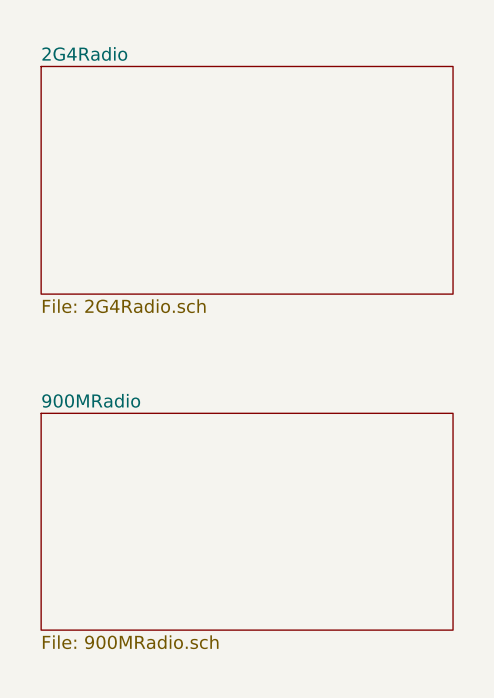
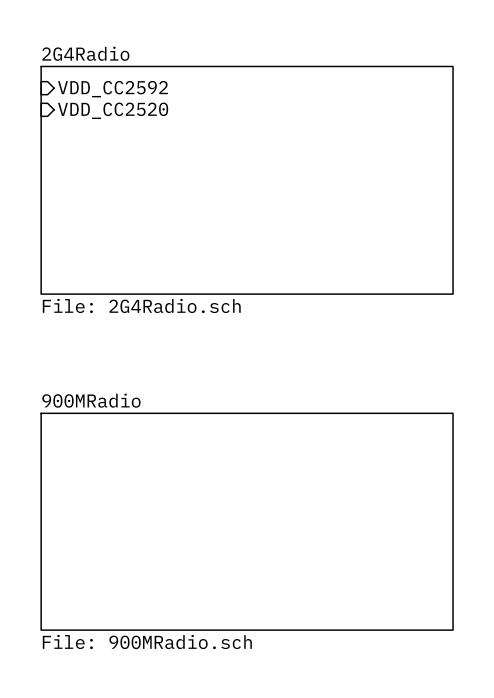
sheet pin: none -> VDD_CC2592 (113, 89)
sheet pin: none -> VDD_CC2520 (113, 110)

